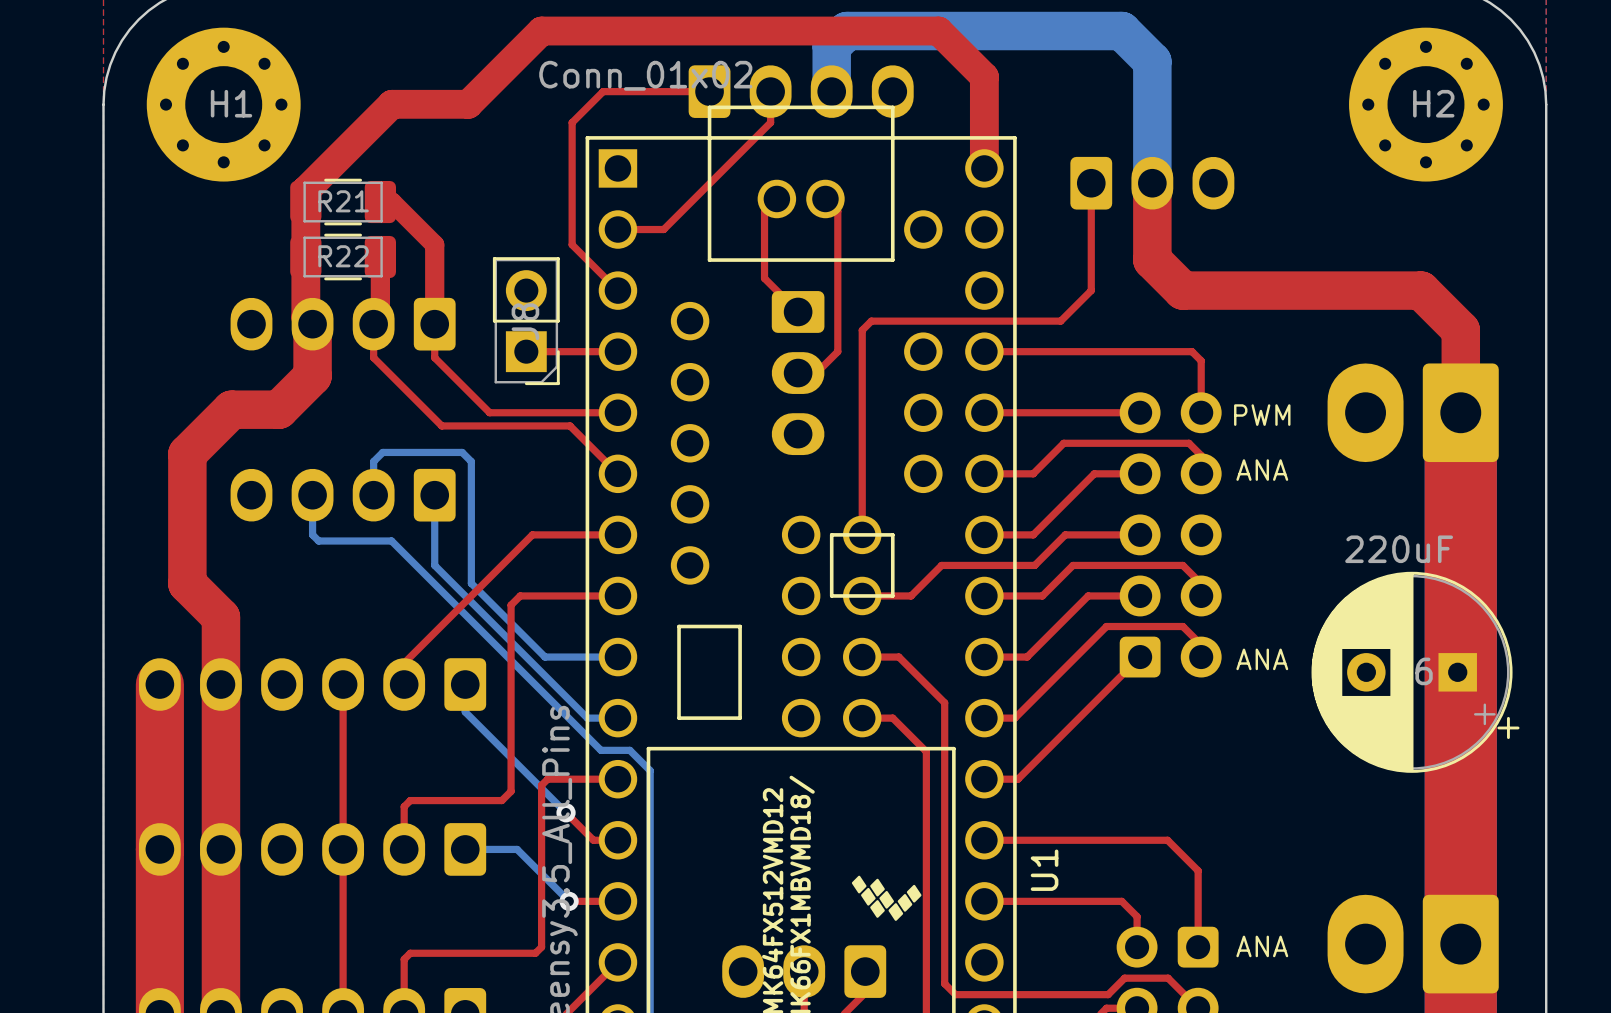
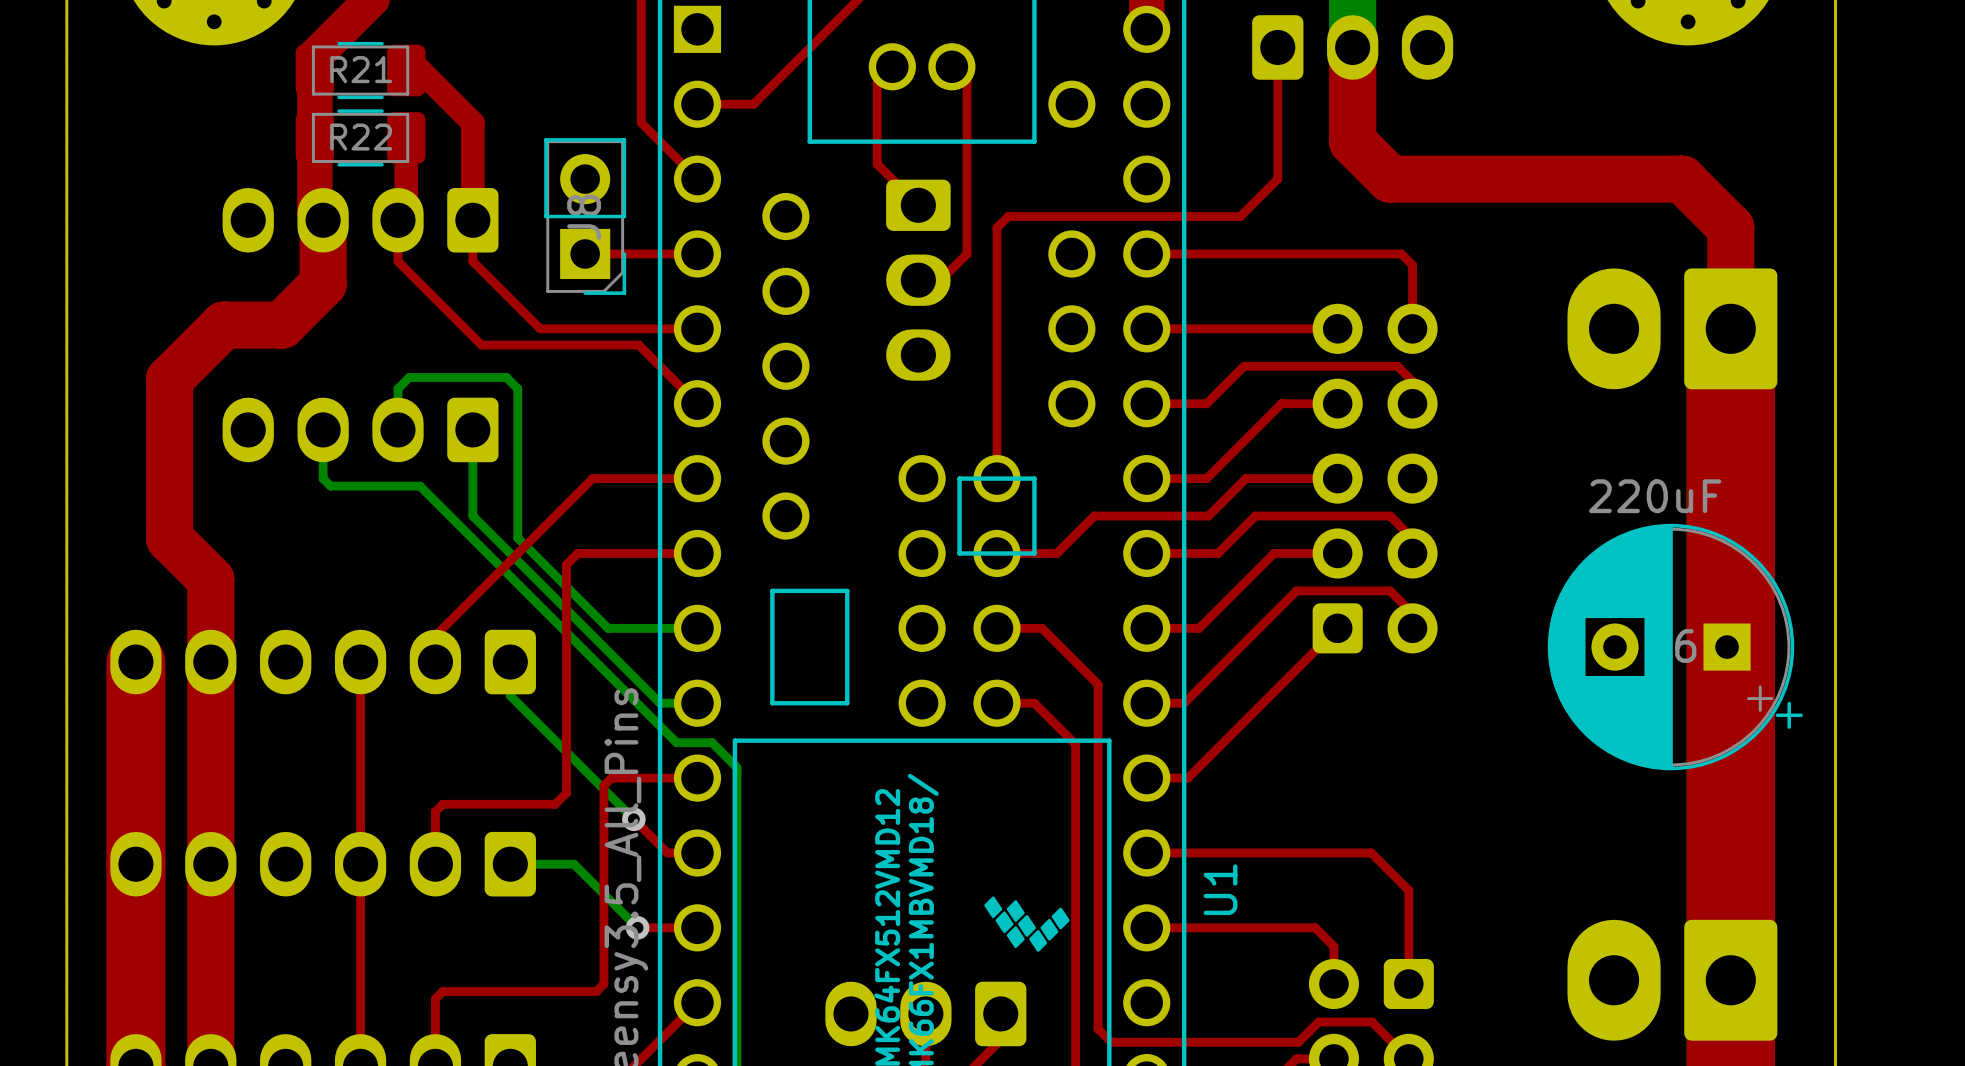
text: PWM (1262, 415) -> none
text: ANA (1262, 470) -> none
text: ANA (1262, 659) -> none
text: ANA (1262, 946) -> none

